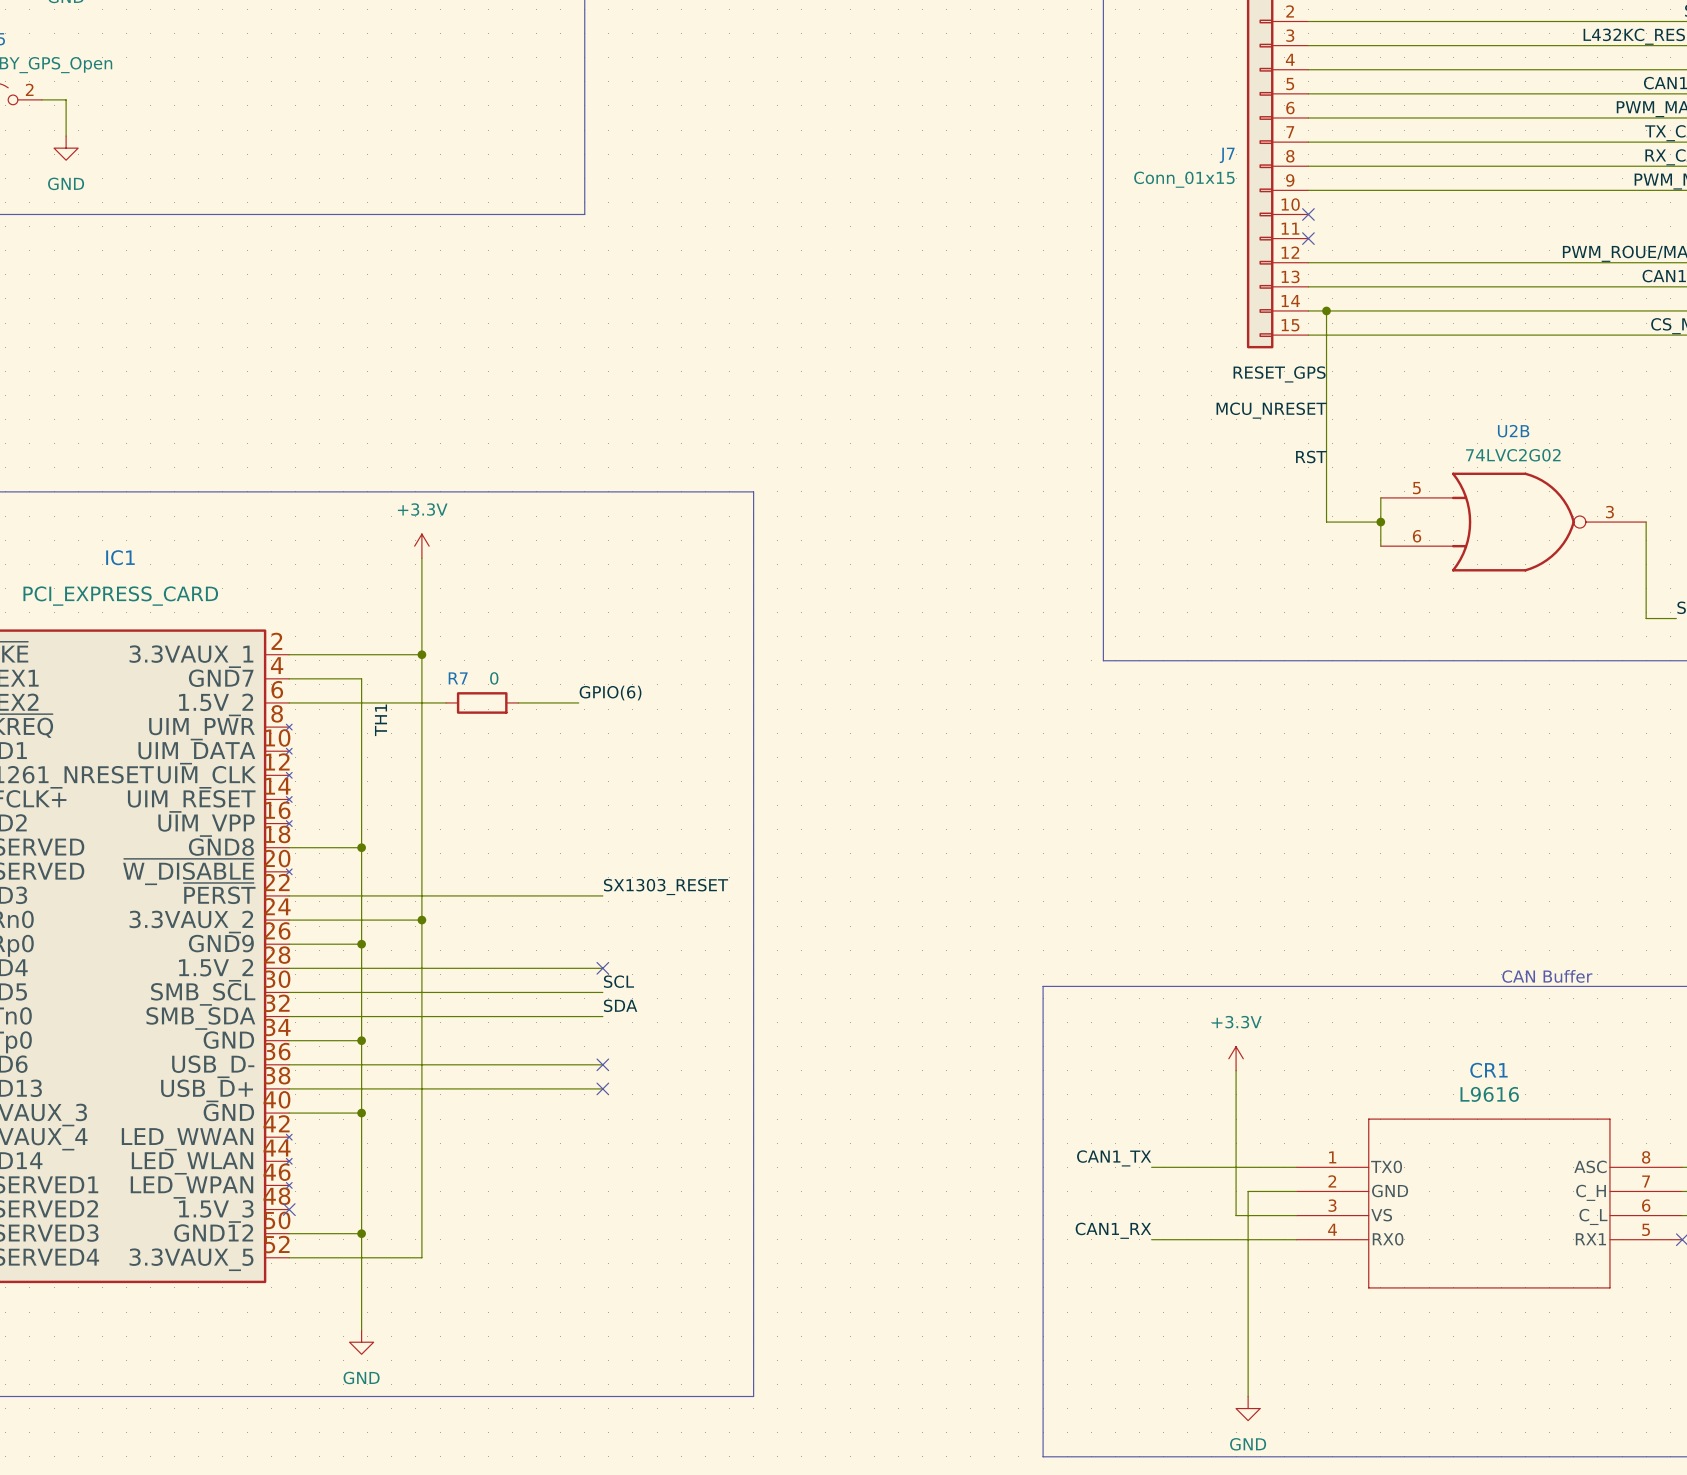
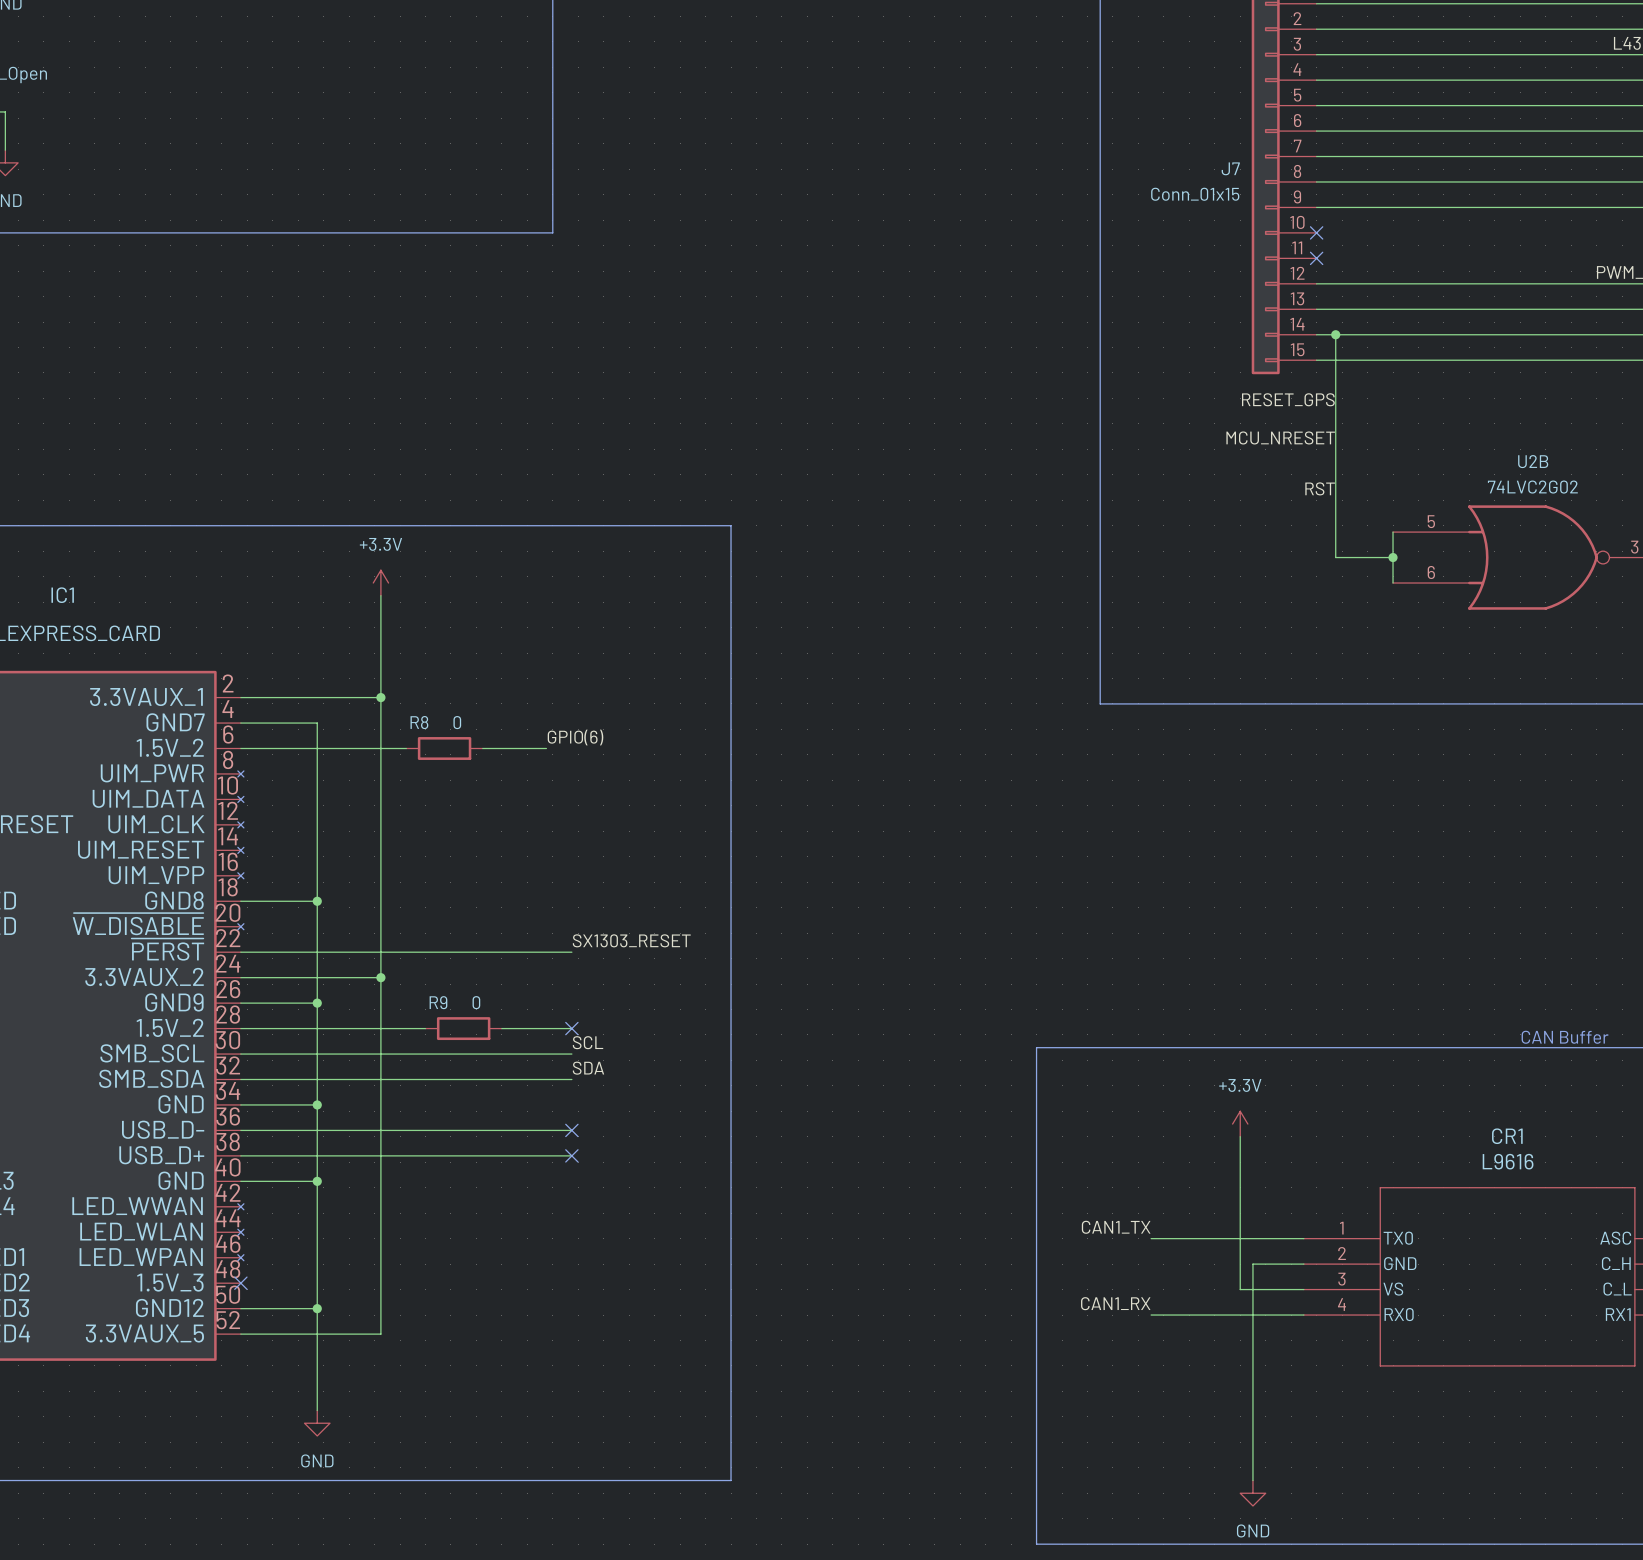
R7 name: R7 (458, 678) -> R8 (419, 722)
label: TH1 (380, 720) -> none
wire: (464, 968) (536, 968) -> none
R9: none -> 0 (463, 1028)

